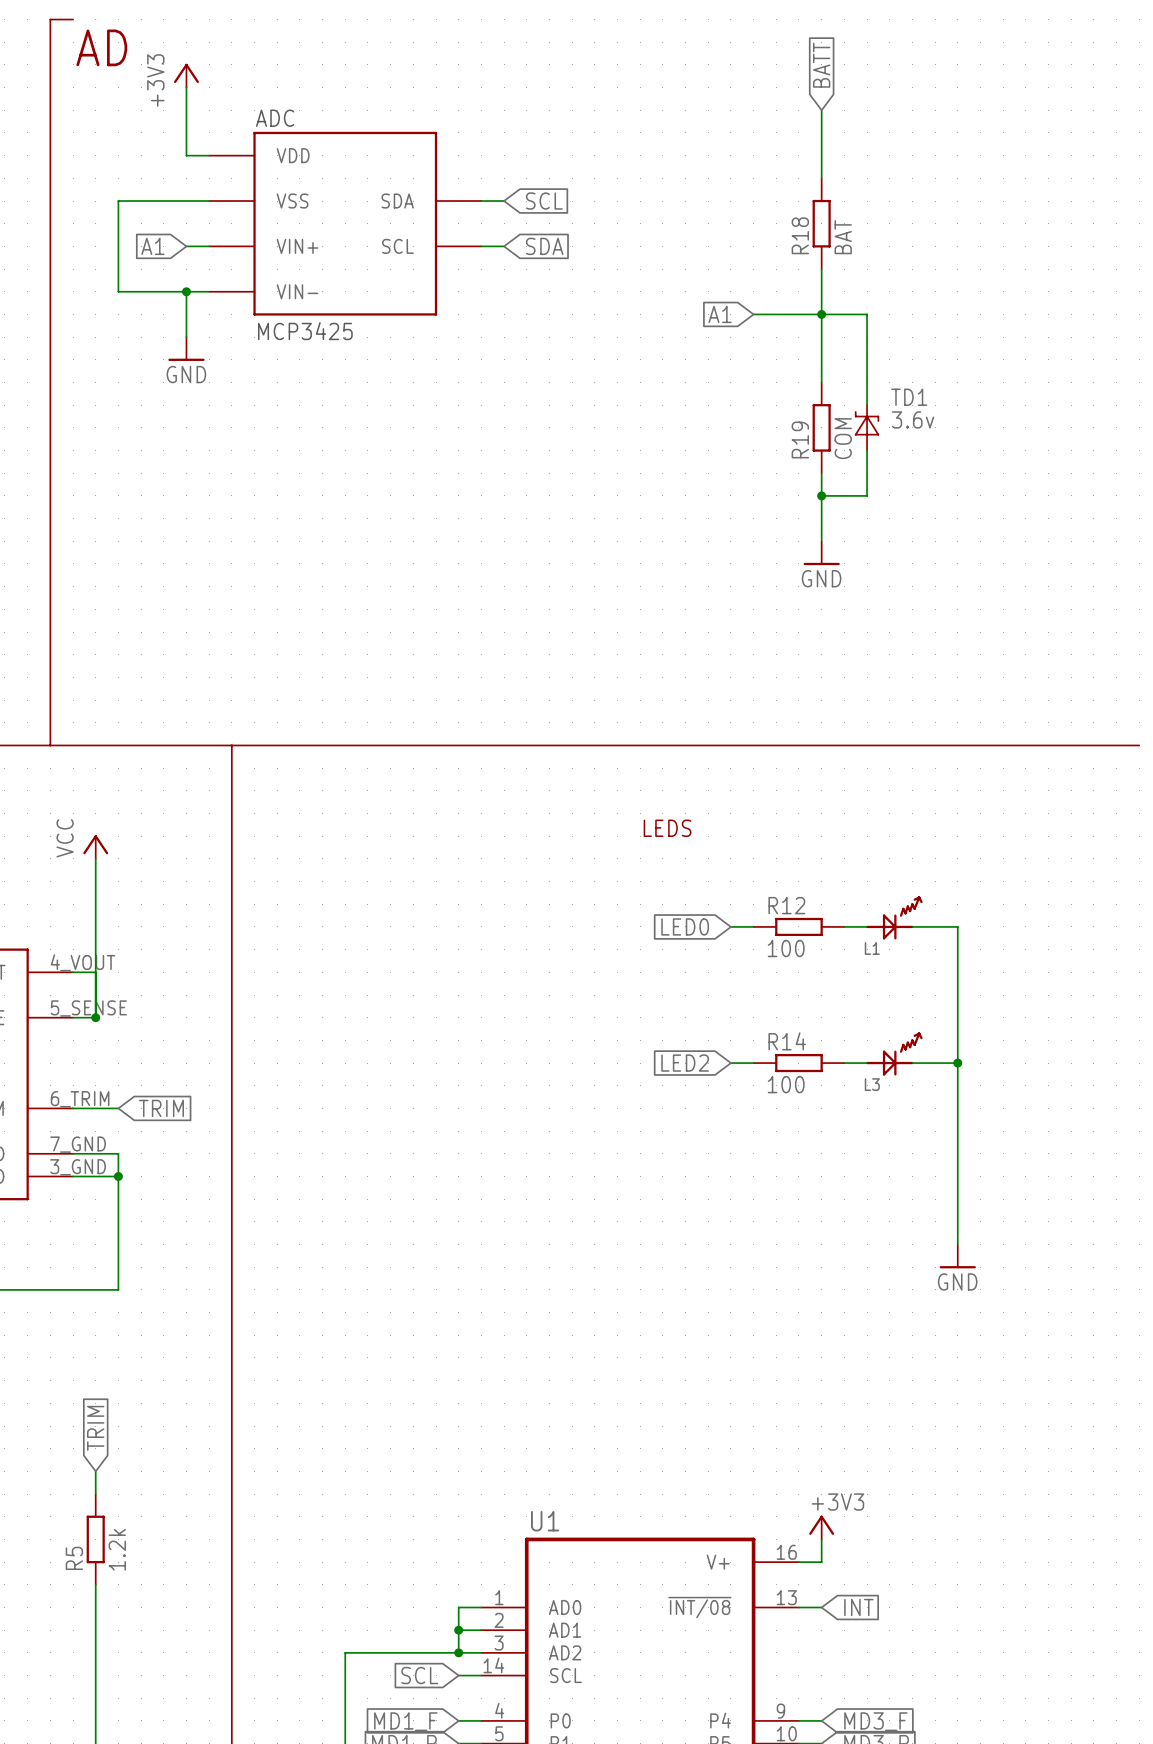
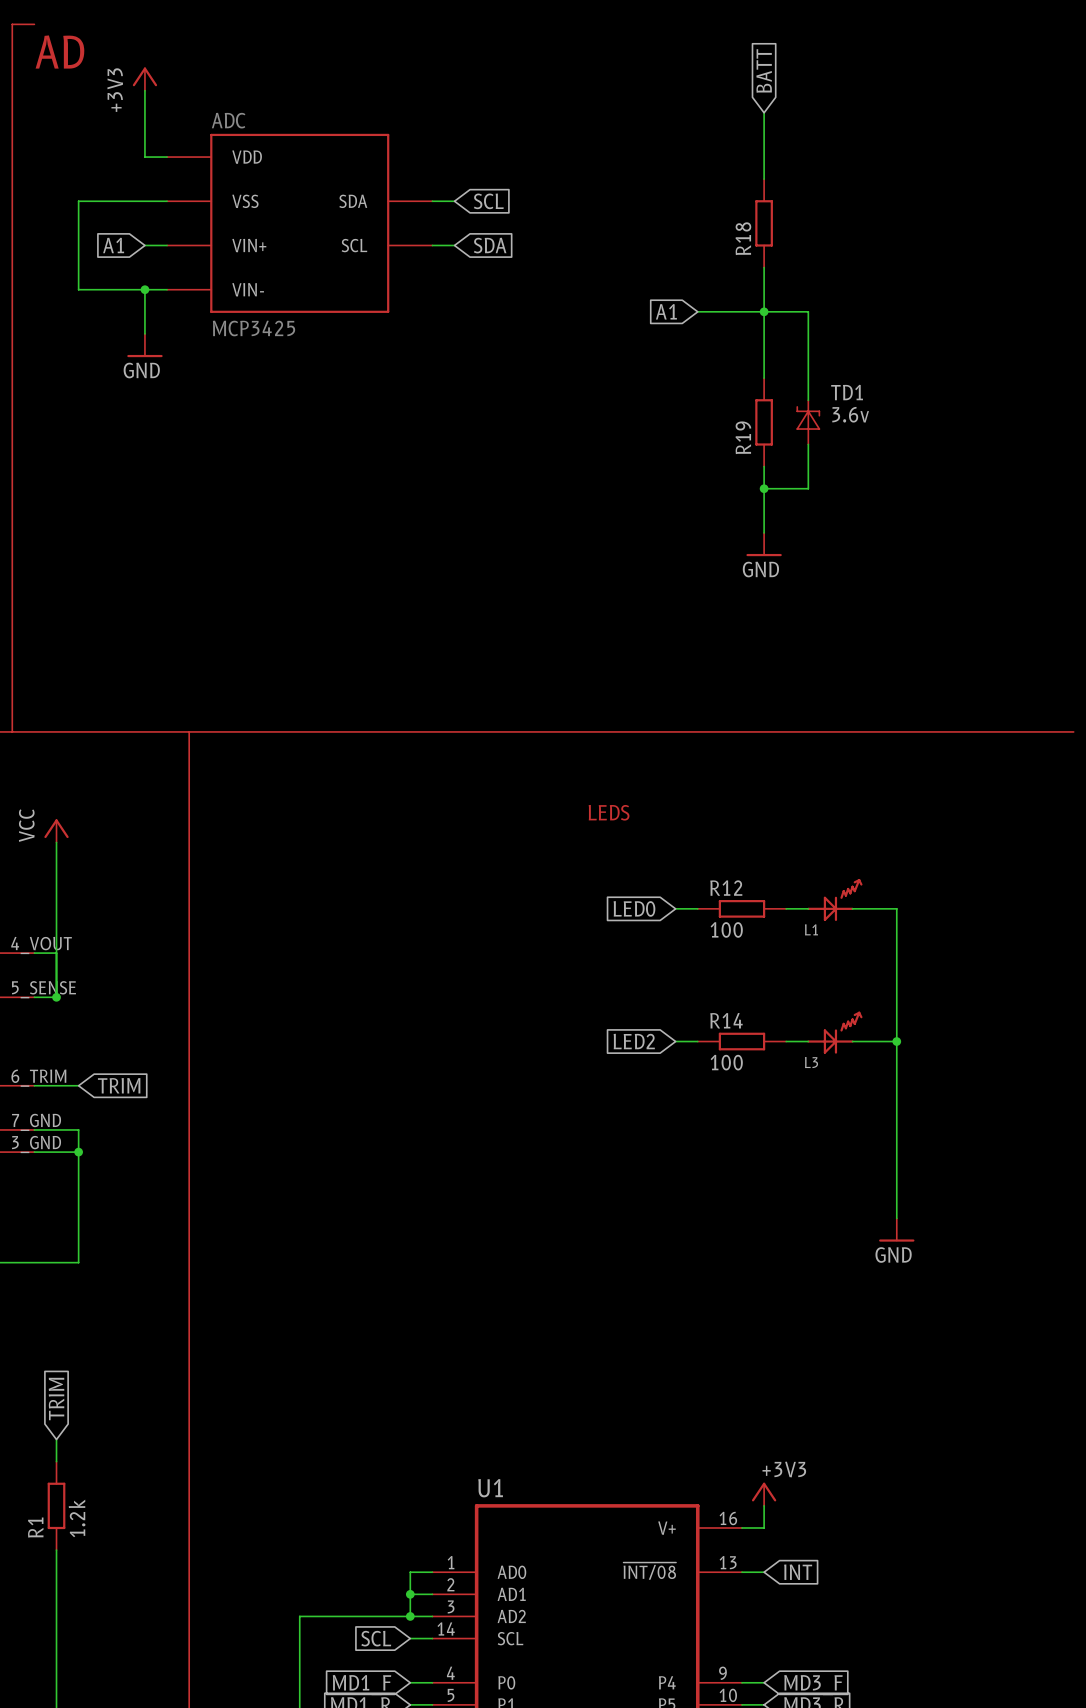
R18 value: BAT (843, 237) -> none
R19 value: COM (843, 438) -> none
R5 name: R5 (74, 1558) -> R1 (35, 1527)

